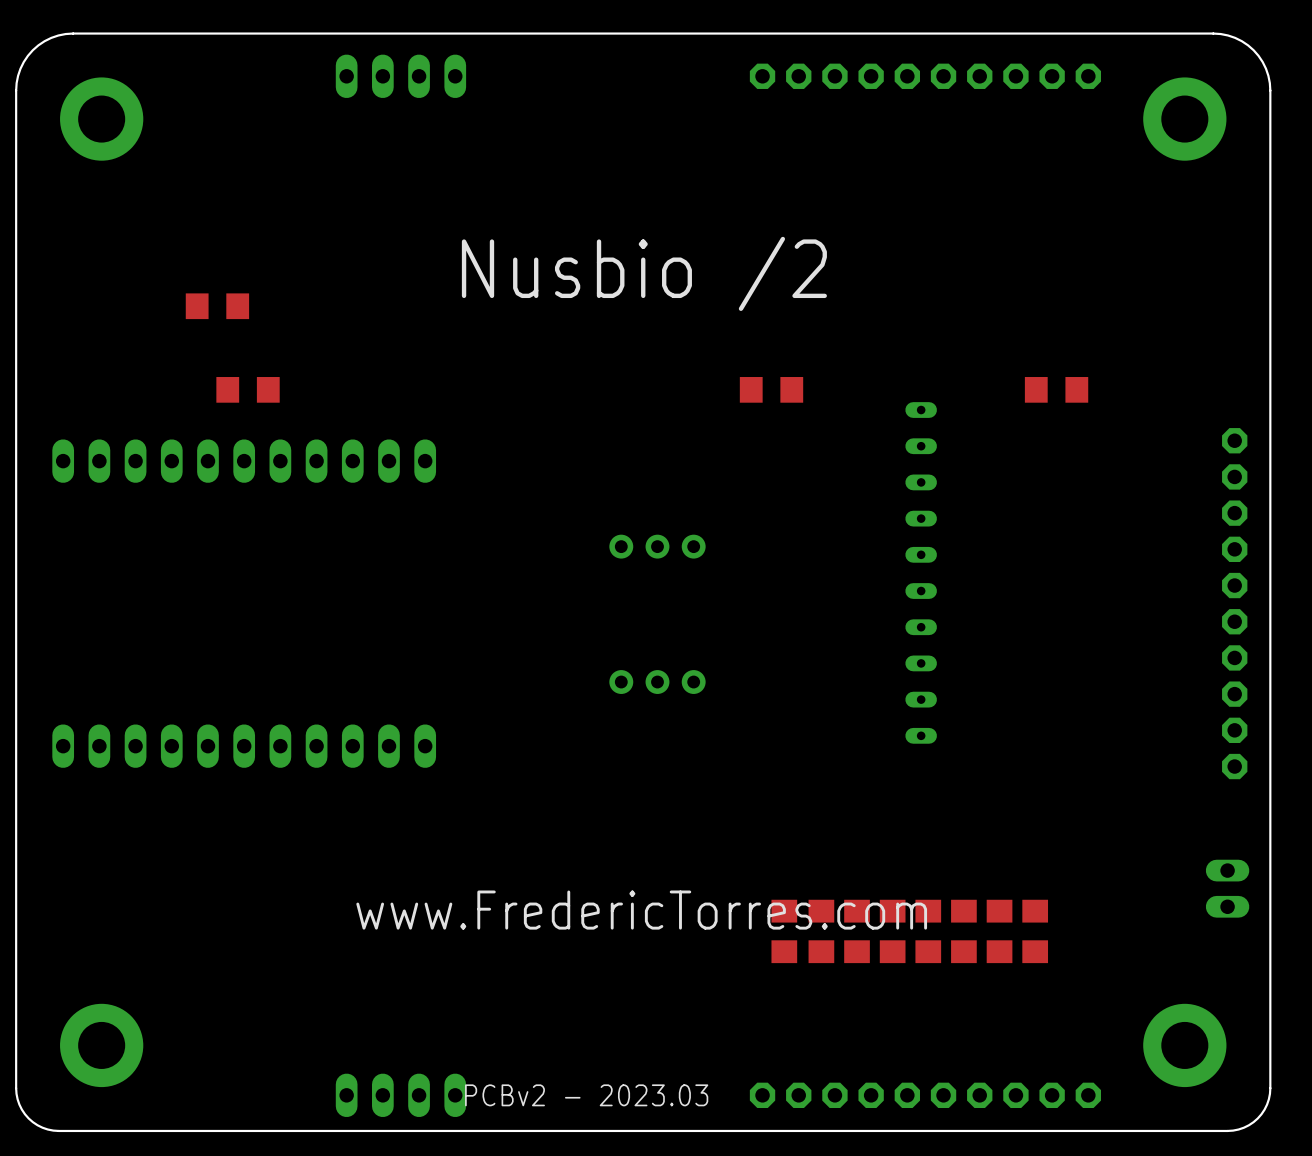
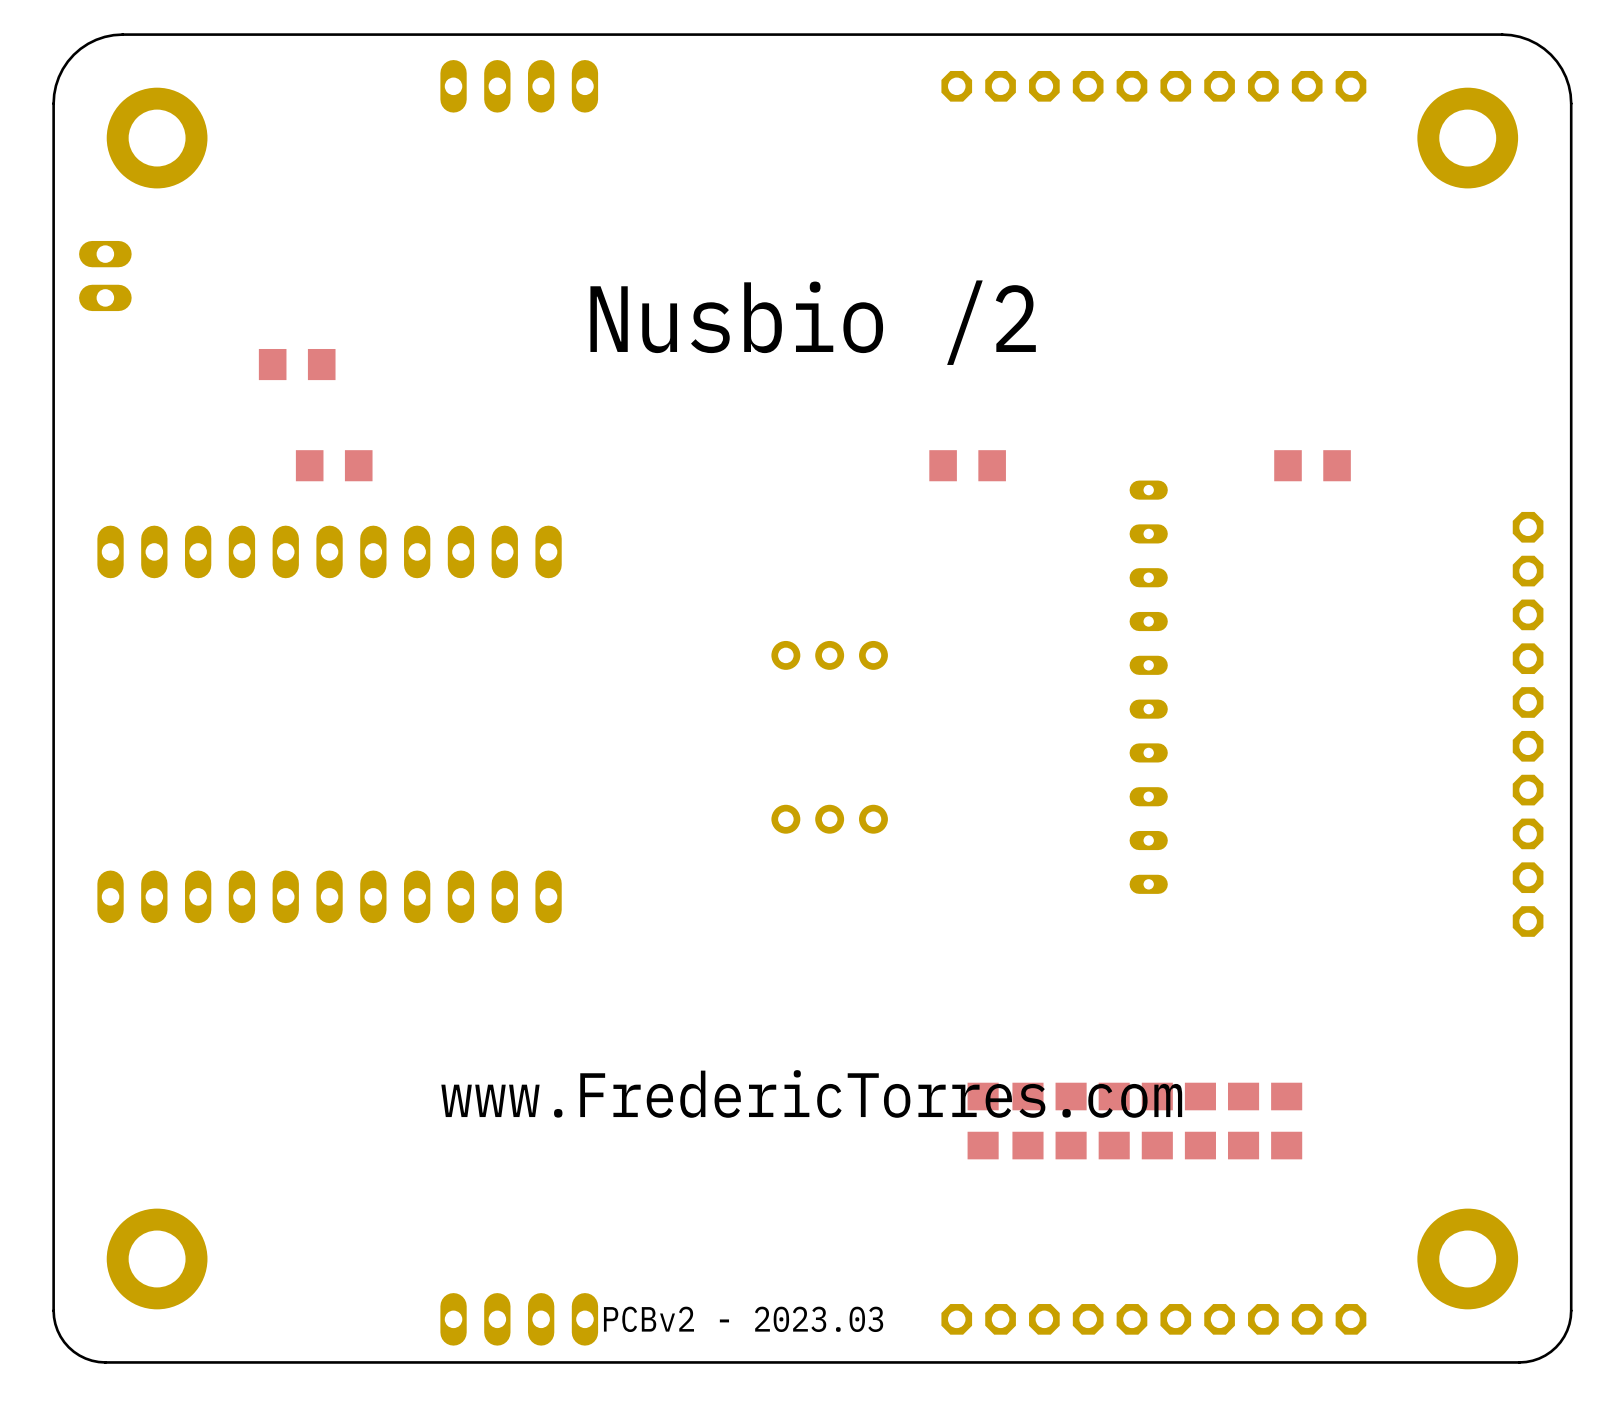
part: none -> (105, 276)
part: (1227, 888) -> none

